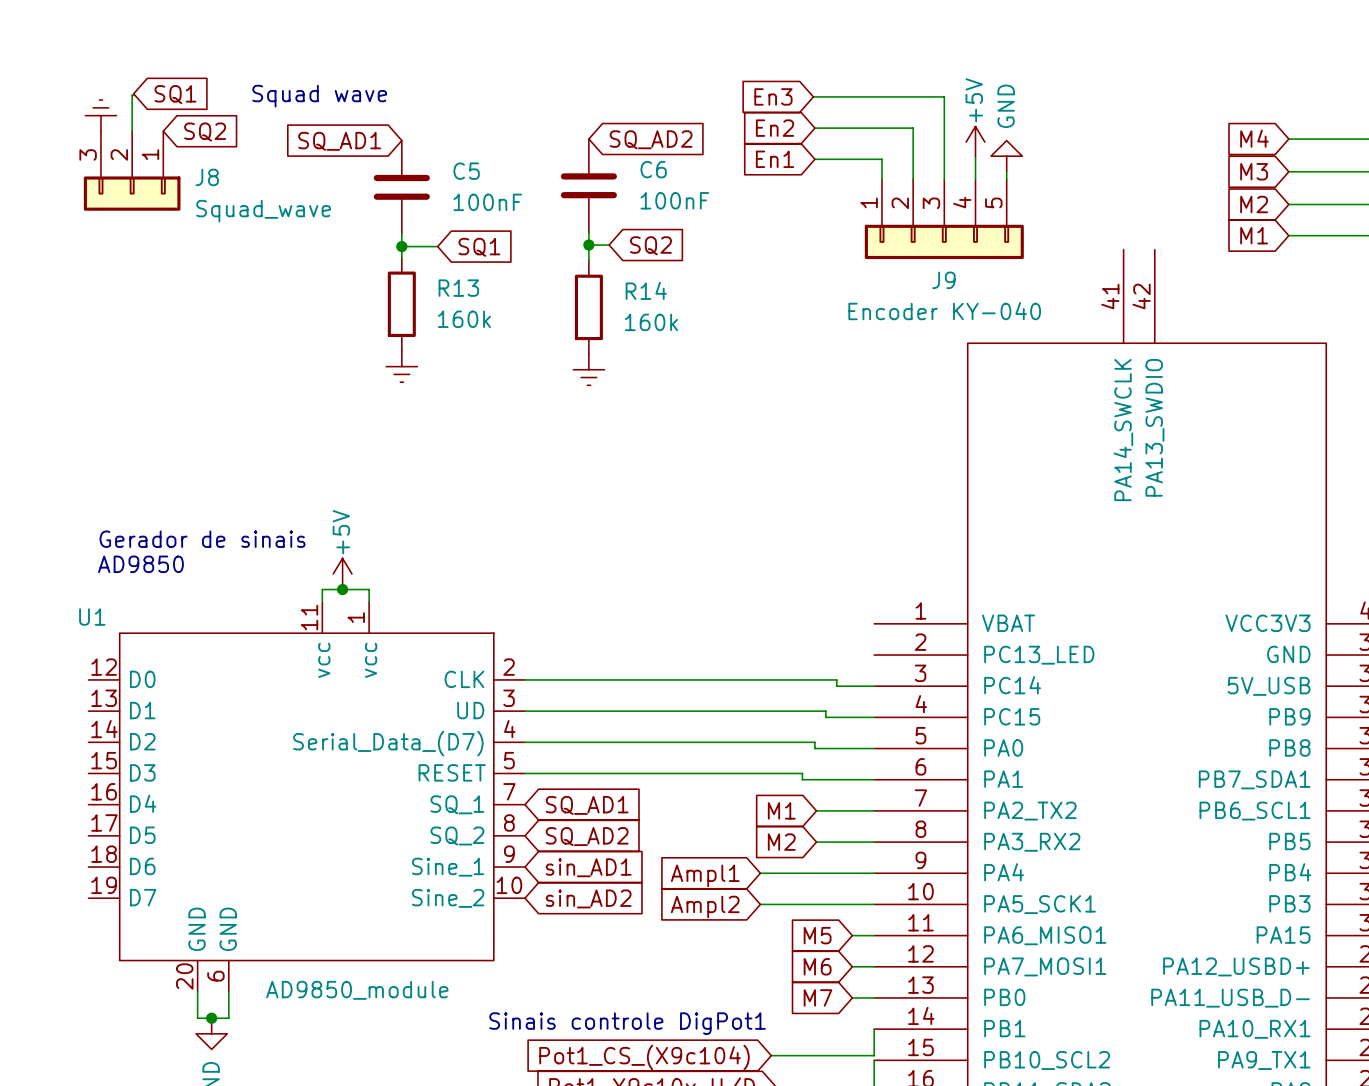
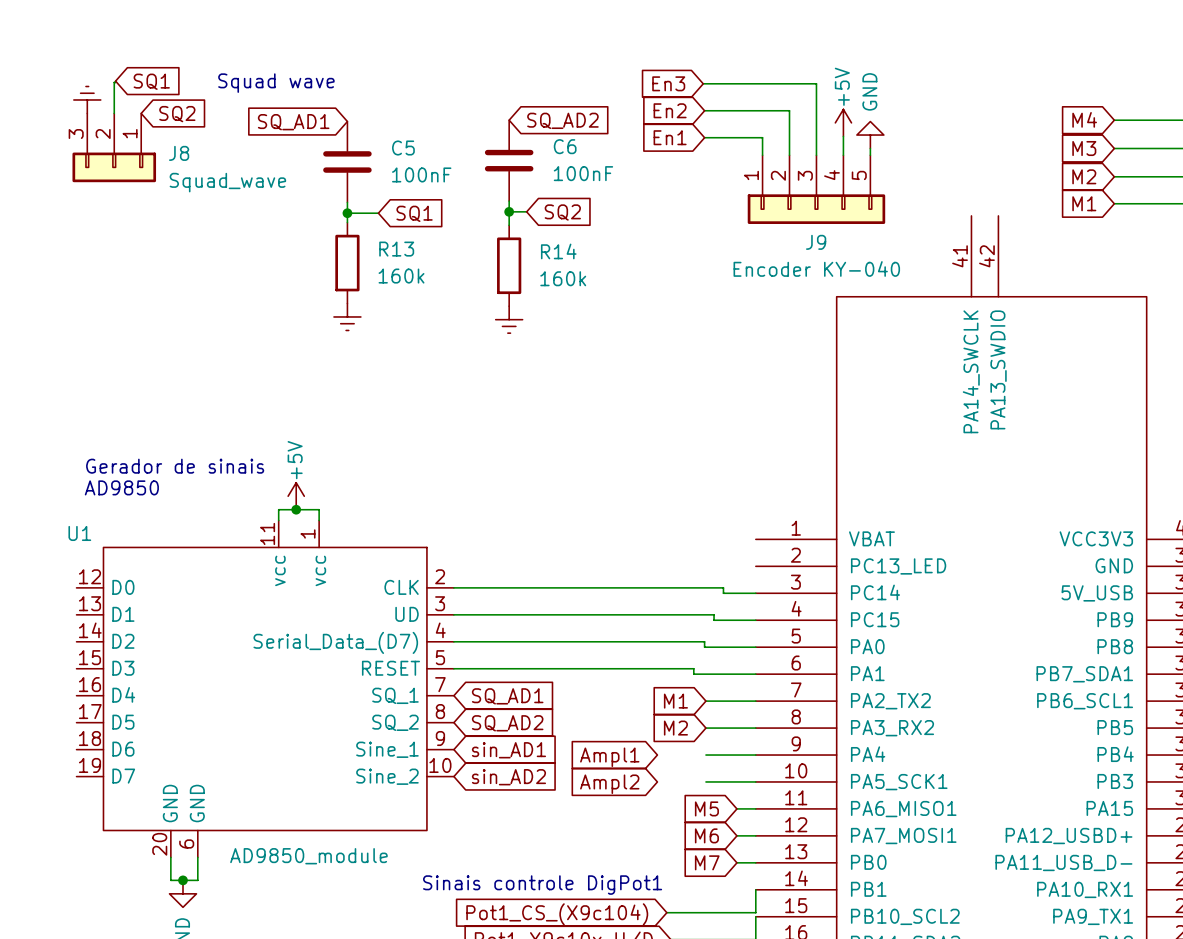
wire: (760, 873) (816, 873) -> none
wire: (760, 904) (816, 904) -> none

